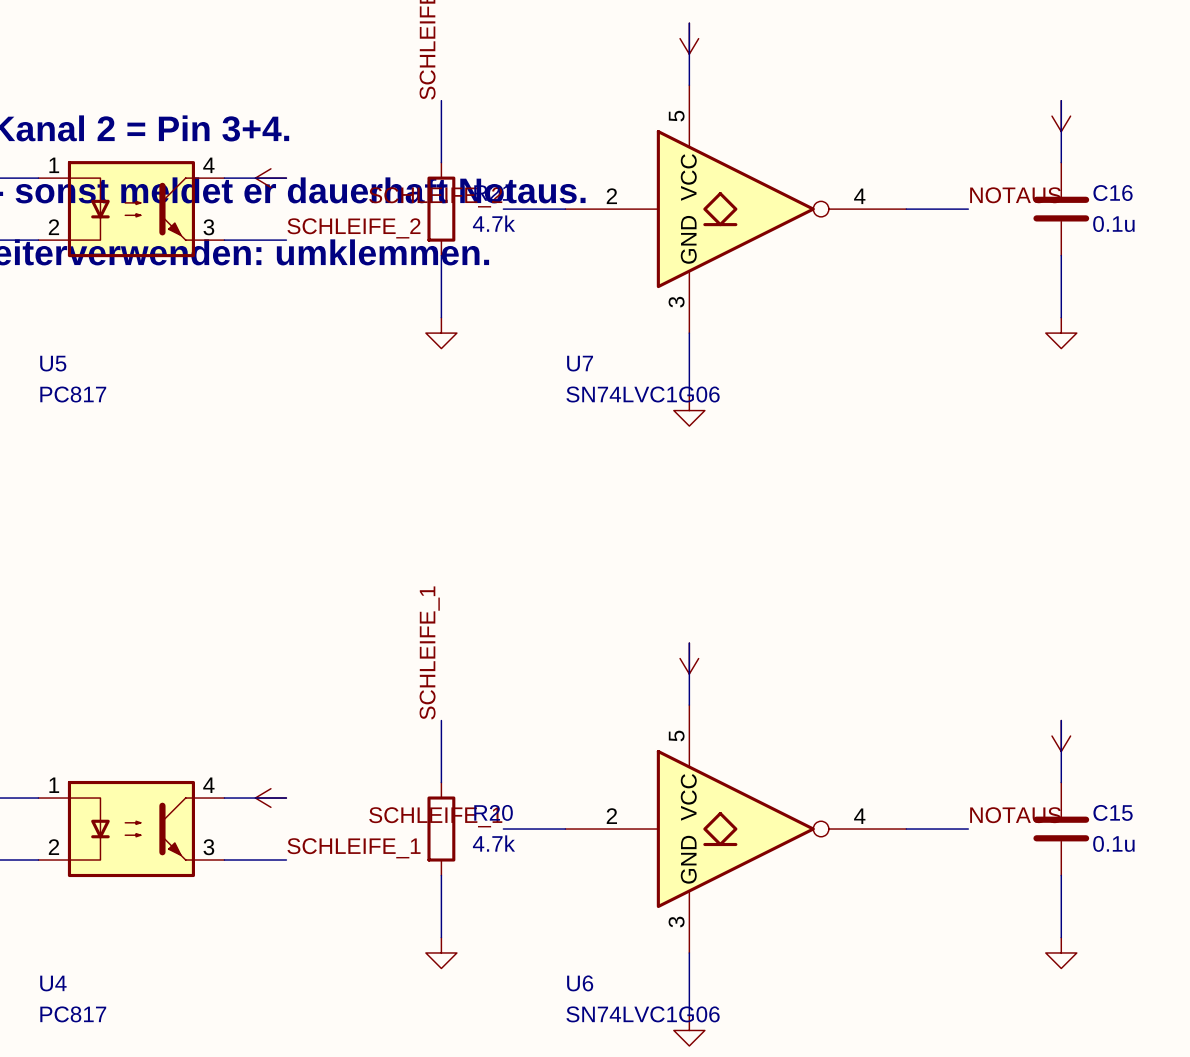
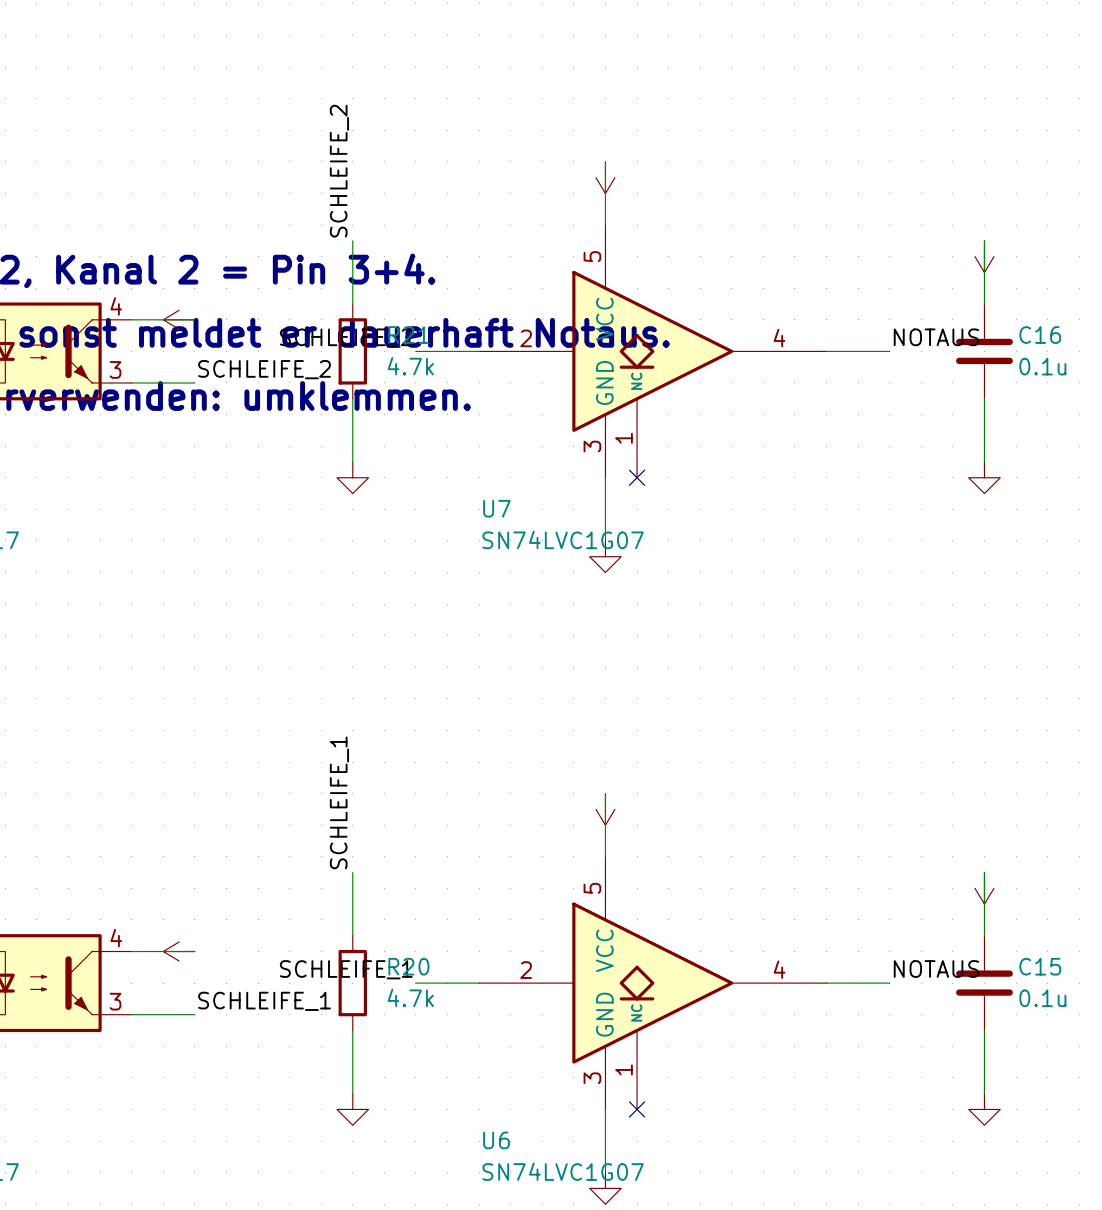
U7 symbol: [565, 85, 907, 334] -> [479, 225, 827, 478]
no-connect mark: none -> (637, 477)
U7 value: SN74LVC1G06 (643, 394) -> SN74LVC1G07 (563, 539)
U6 symbol: [565, 705, 907, 953] -> [479, 856, 827, 1110]
no-connect mark: none -> (637, 1109)
U6 value: SN74LVC1G06 (643, 1014) -> SN74LVC1G07 (563, 1171)

